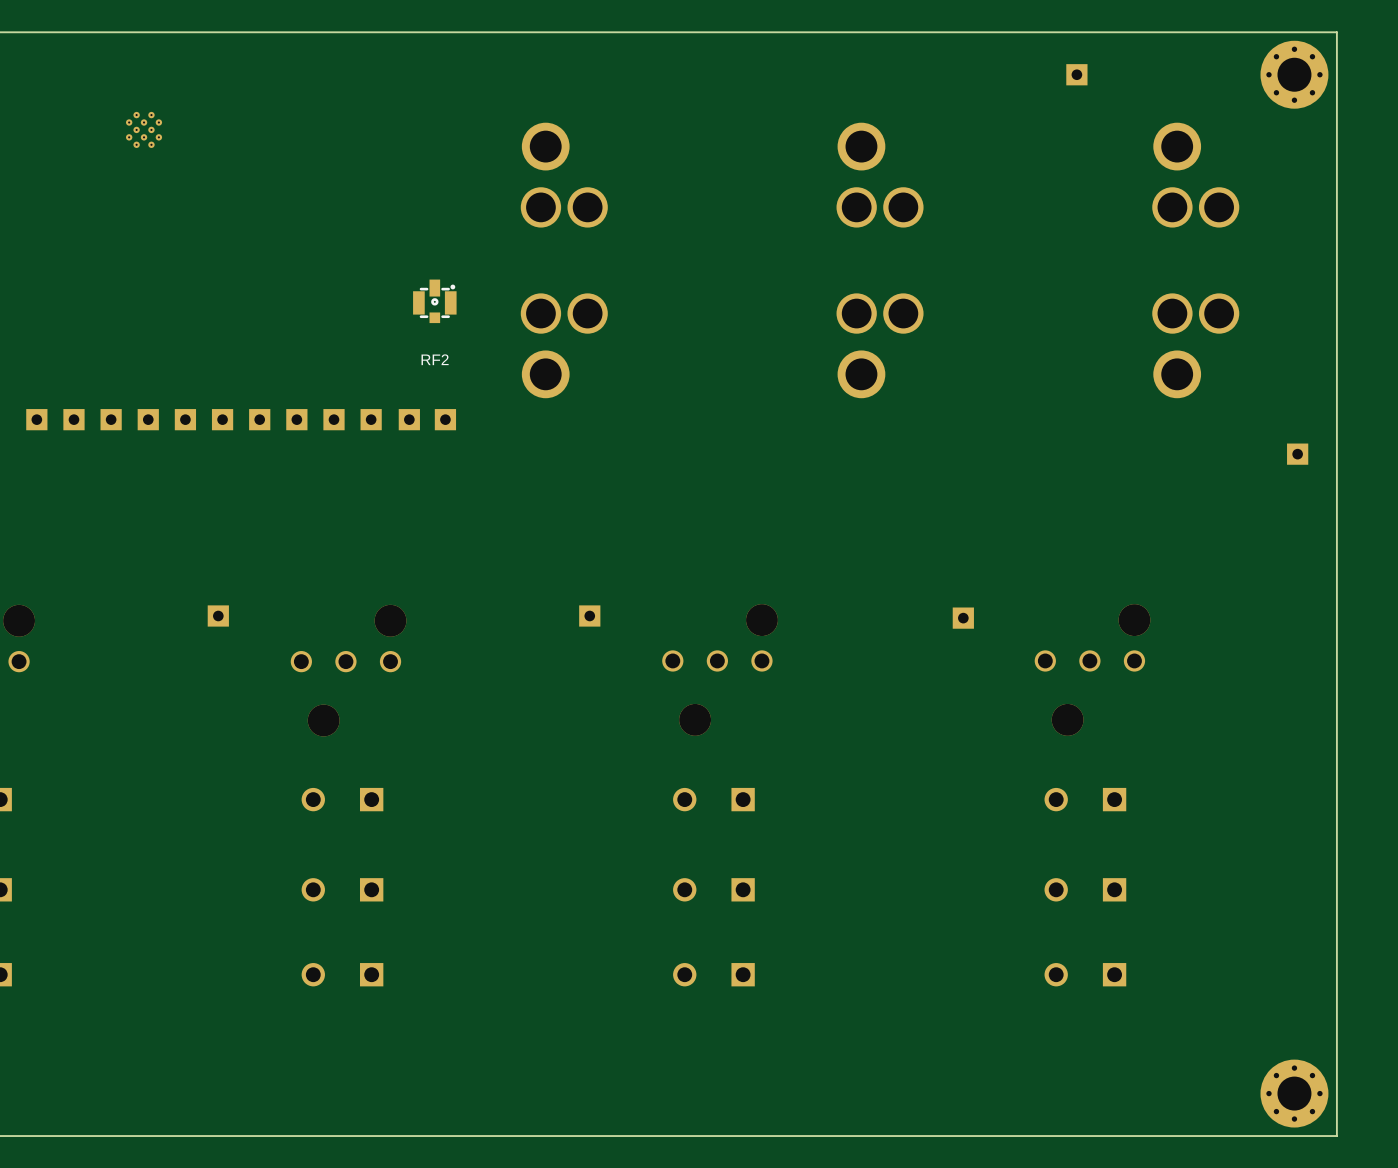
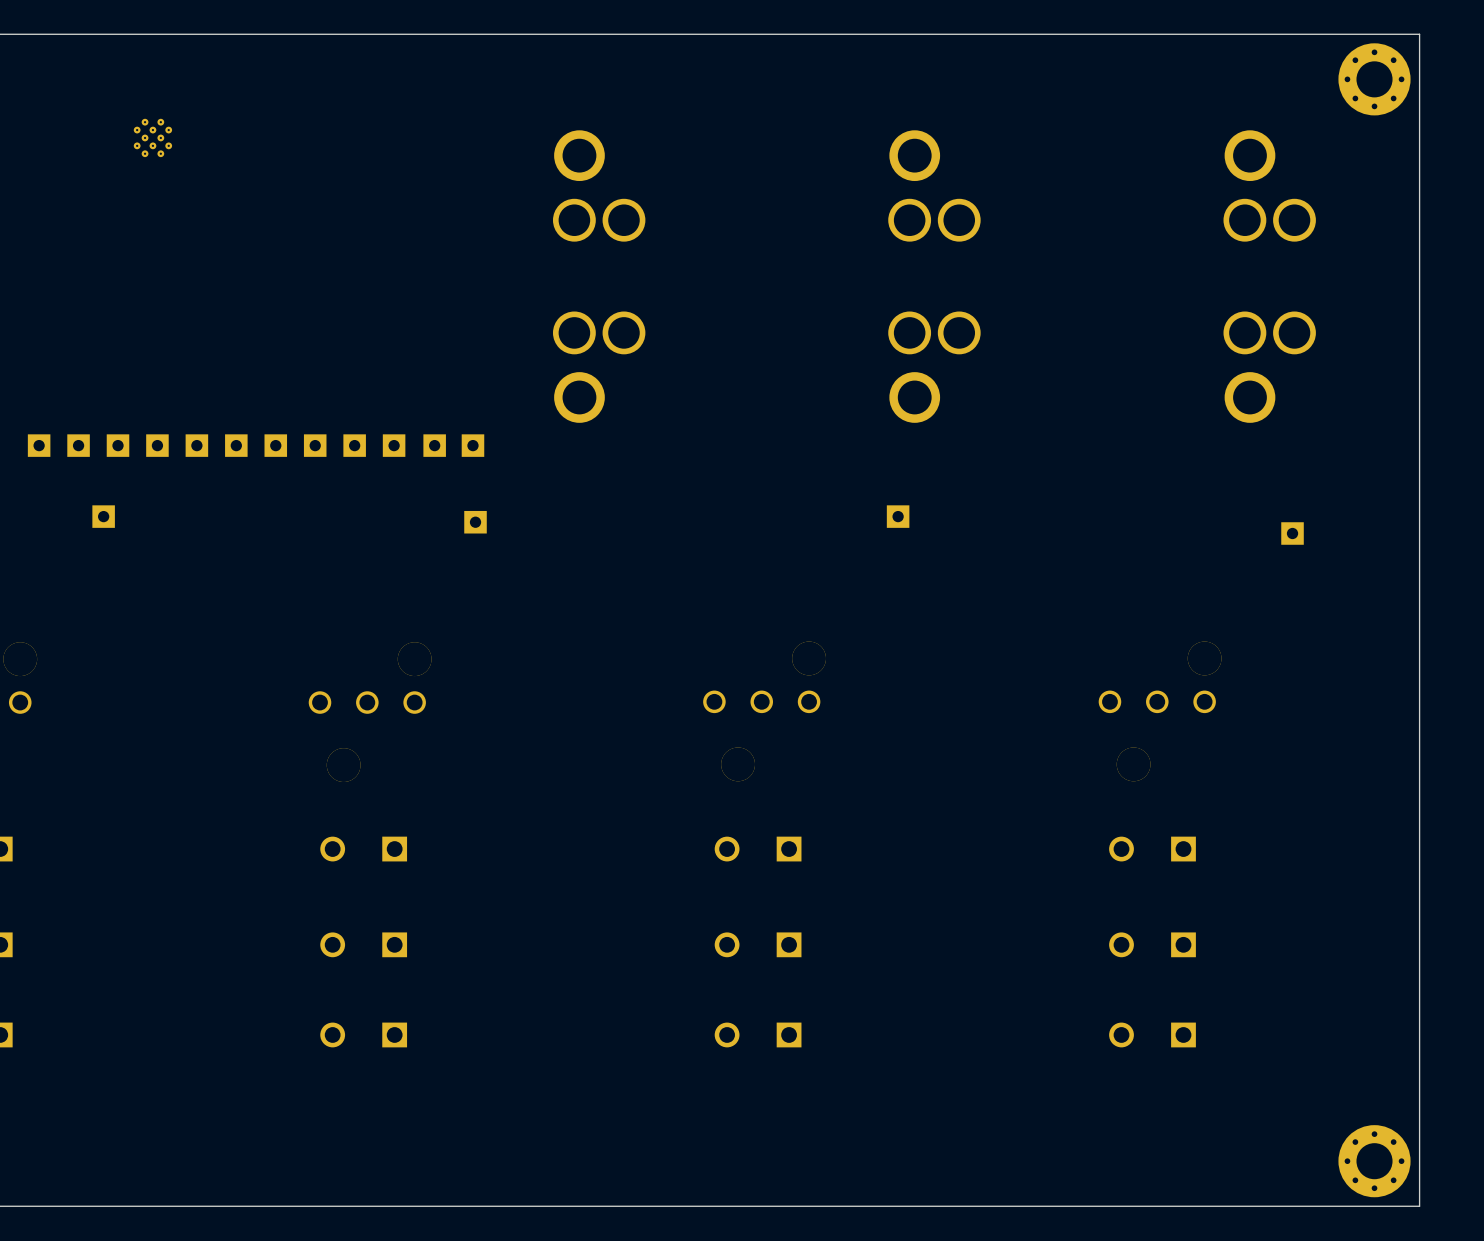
part: (1076, 74) -> none
RF2: (434, 301) -> none
part position: (1297, 454) -> (1292, 533)
part: none -> (103, 516)
part: none -> (898, 516)
part: none -> (475, 522)
part: (218, 615) -> none
part: (589, 615) -> none
part: (963, 618) -> none

